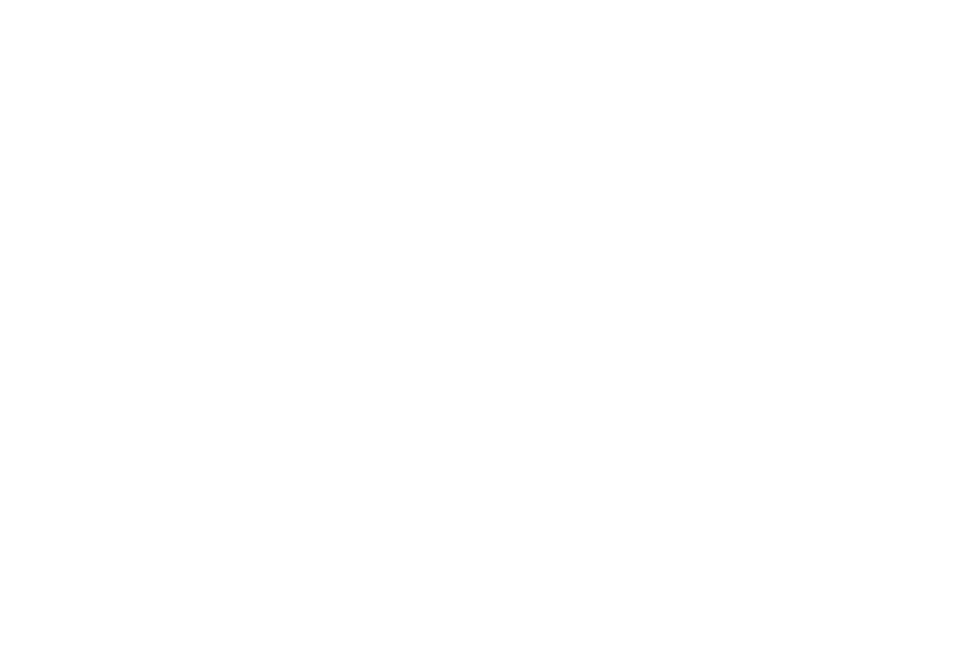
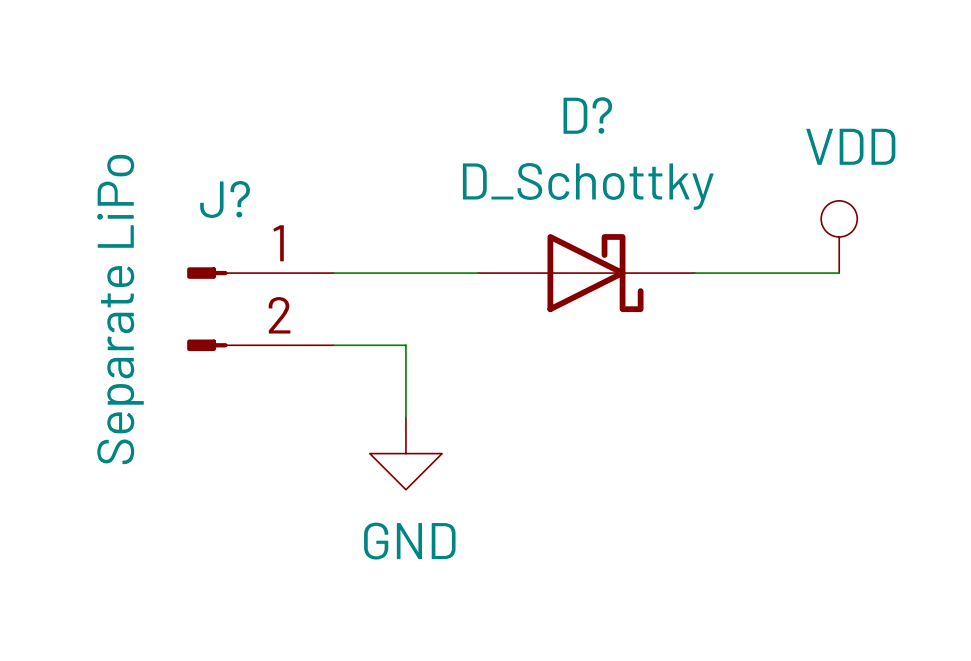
power symbol: none -> VDD (839, 236)
wire: none -> (333, 273) (478, 273)
D?: none -> D_Schottky (586, 273)
wire: none -> (694, 273) (839, 273)
J?: none -> Separate LiPo (260, 309)
wire: none -> (333, 345) (405, 345) (405, 417)
power symbol: none -> GND (405, 453)

